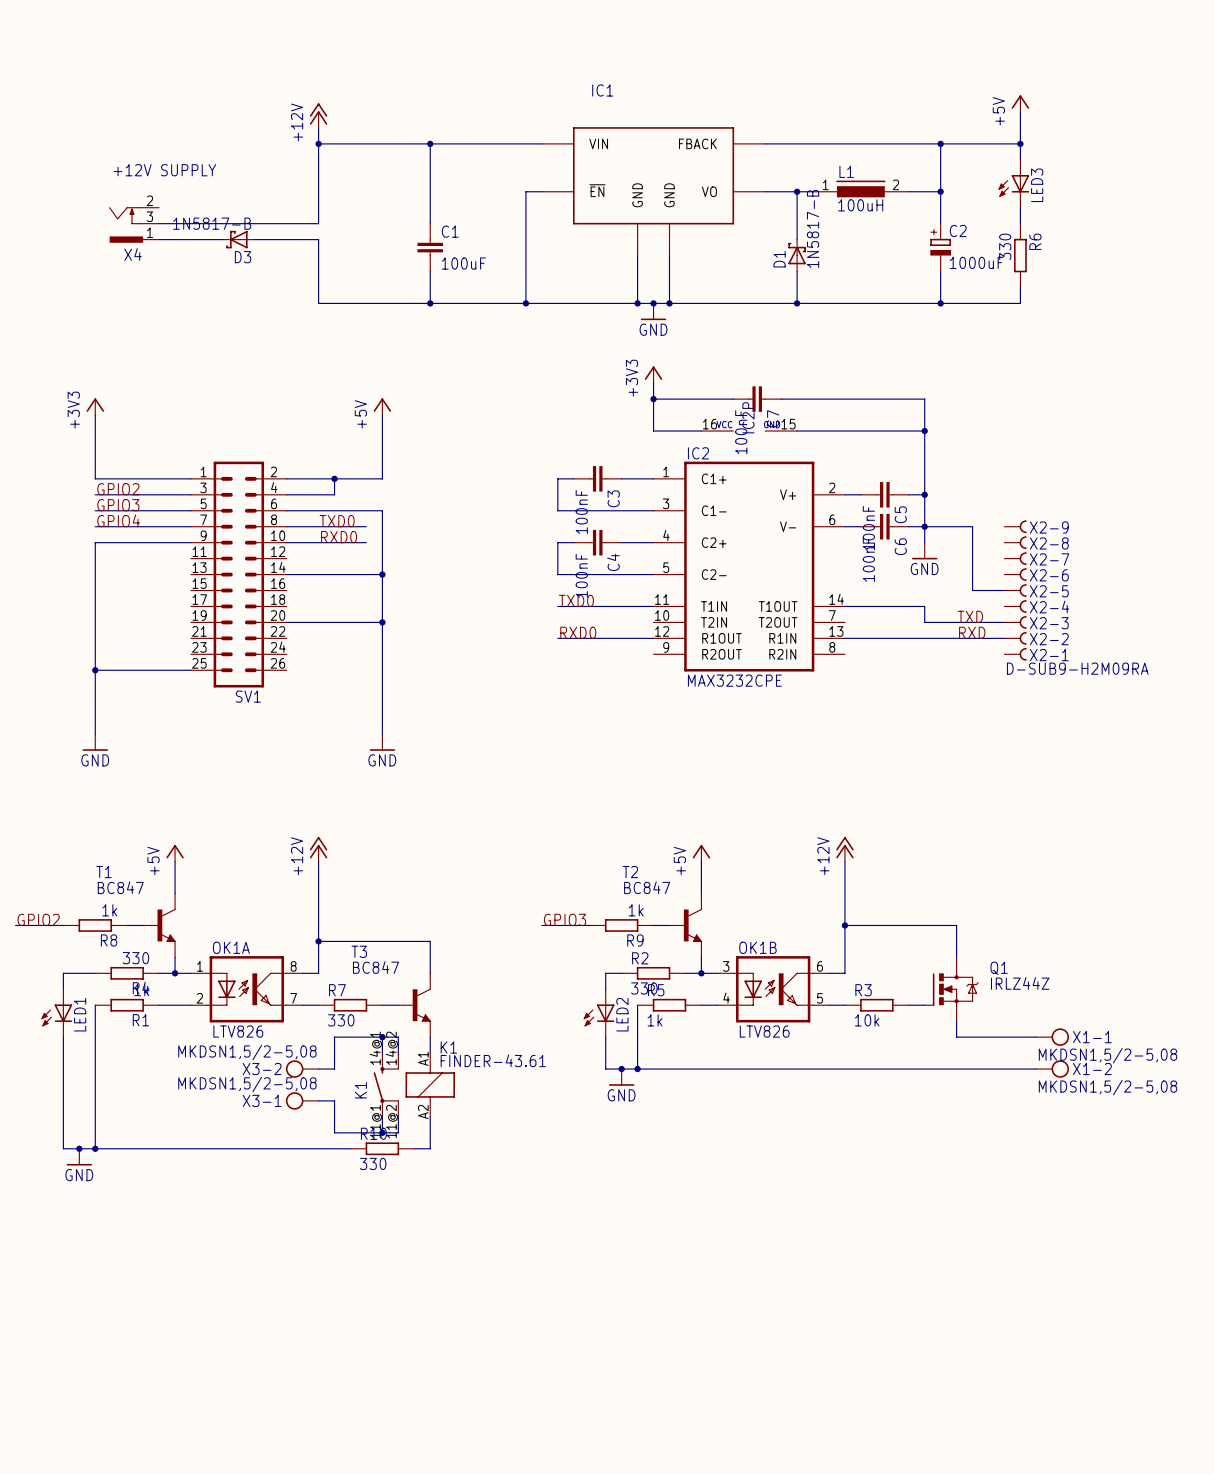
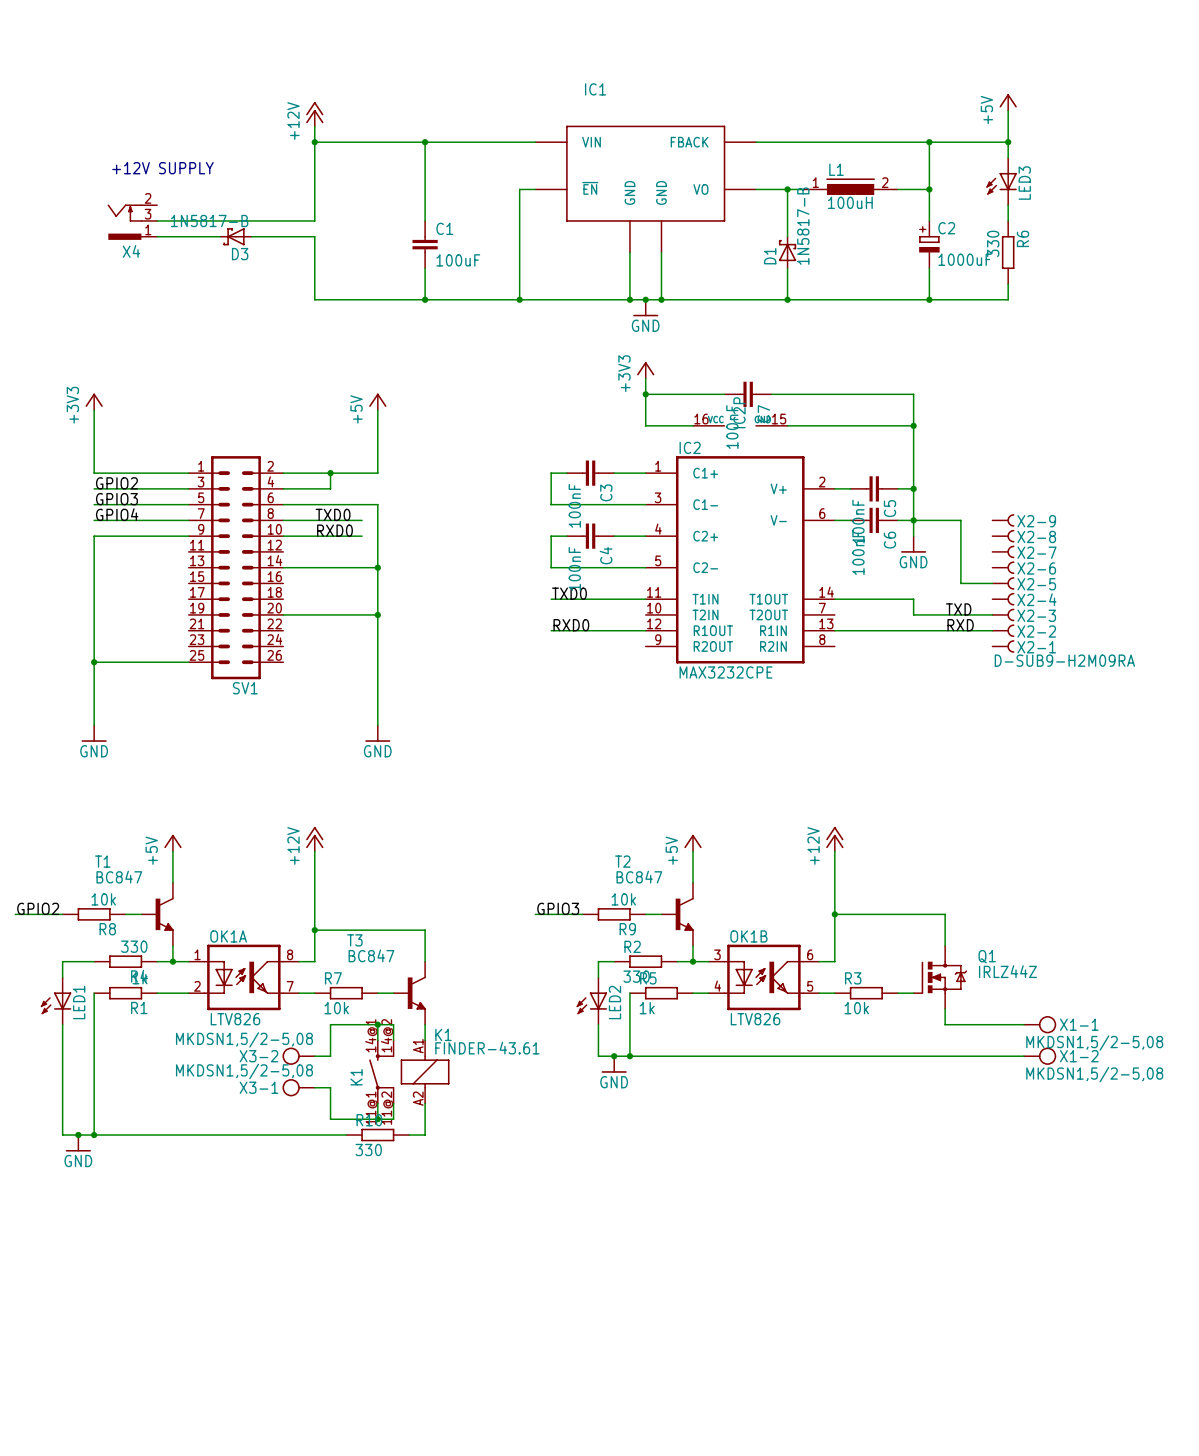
R8 value: 1k (109, 910) -> 10k (103, 899)
R9 value: 1k (636, 910) -> 10k (623, 899)
R7 value: 330 (341, 1020) -> 10k (336, 1008)

